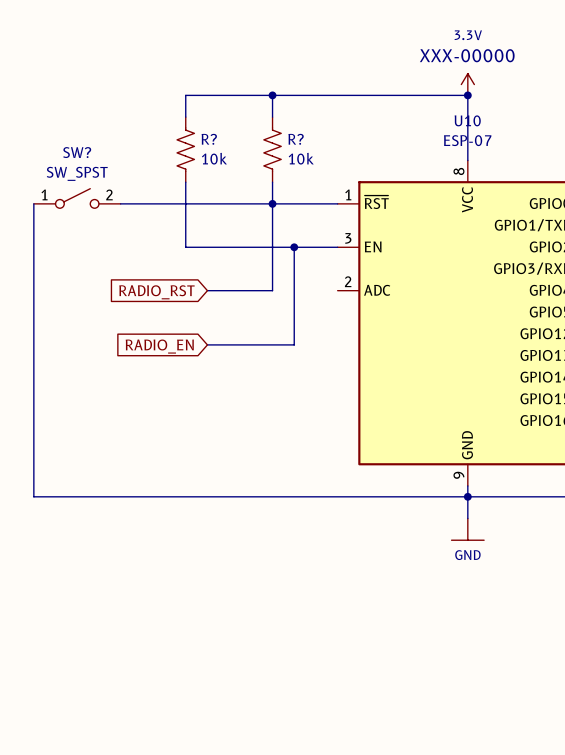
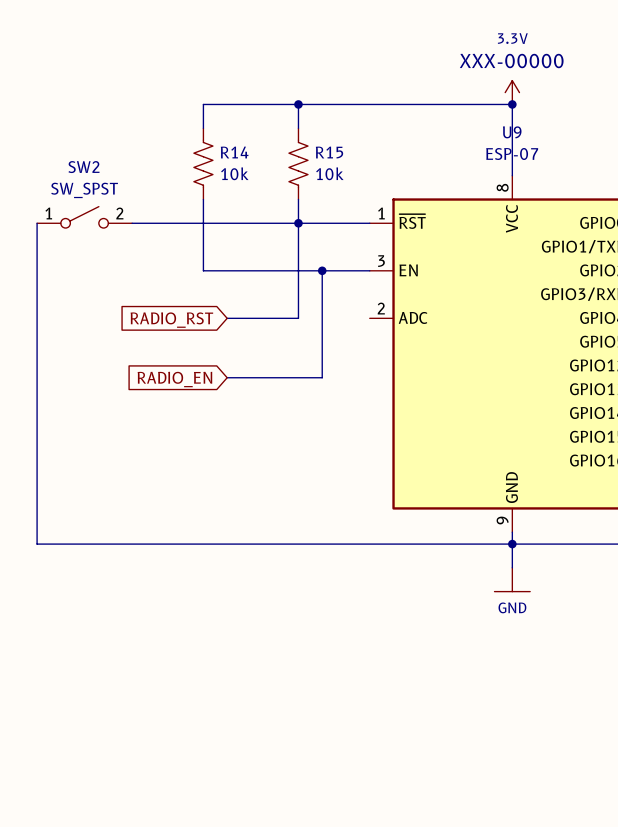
U10 name: U10 (467, 120) -> U9 (512, 132)
R? name: R? (209, 139) -> R14 (234, 152)
R? name: R? (296, 139) -> R15 (329, 152)
SW? name: SW? (77, 152) -> SW2 (83, 167)

